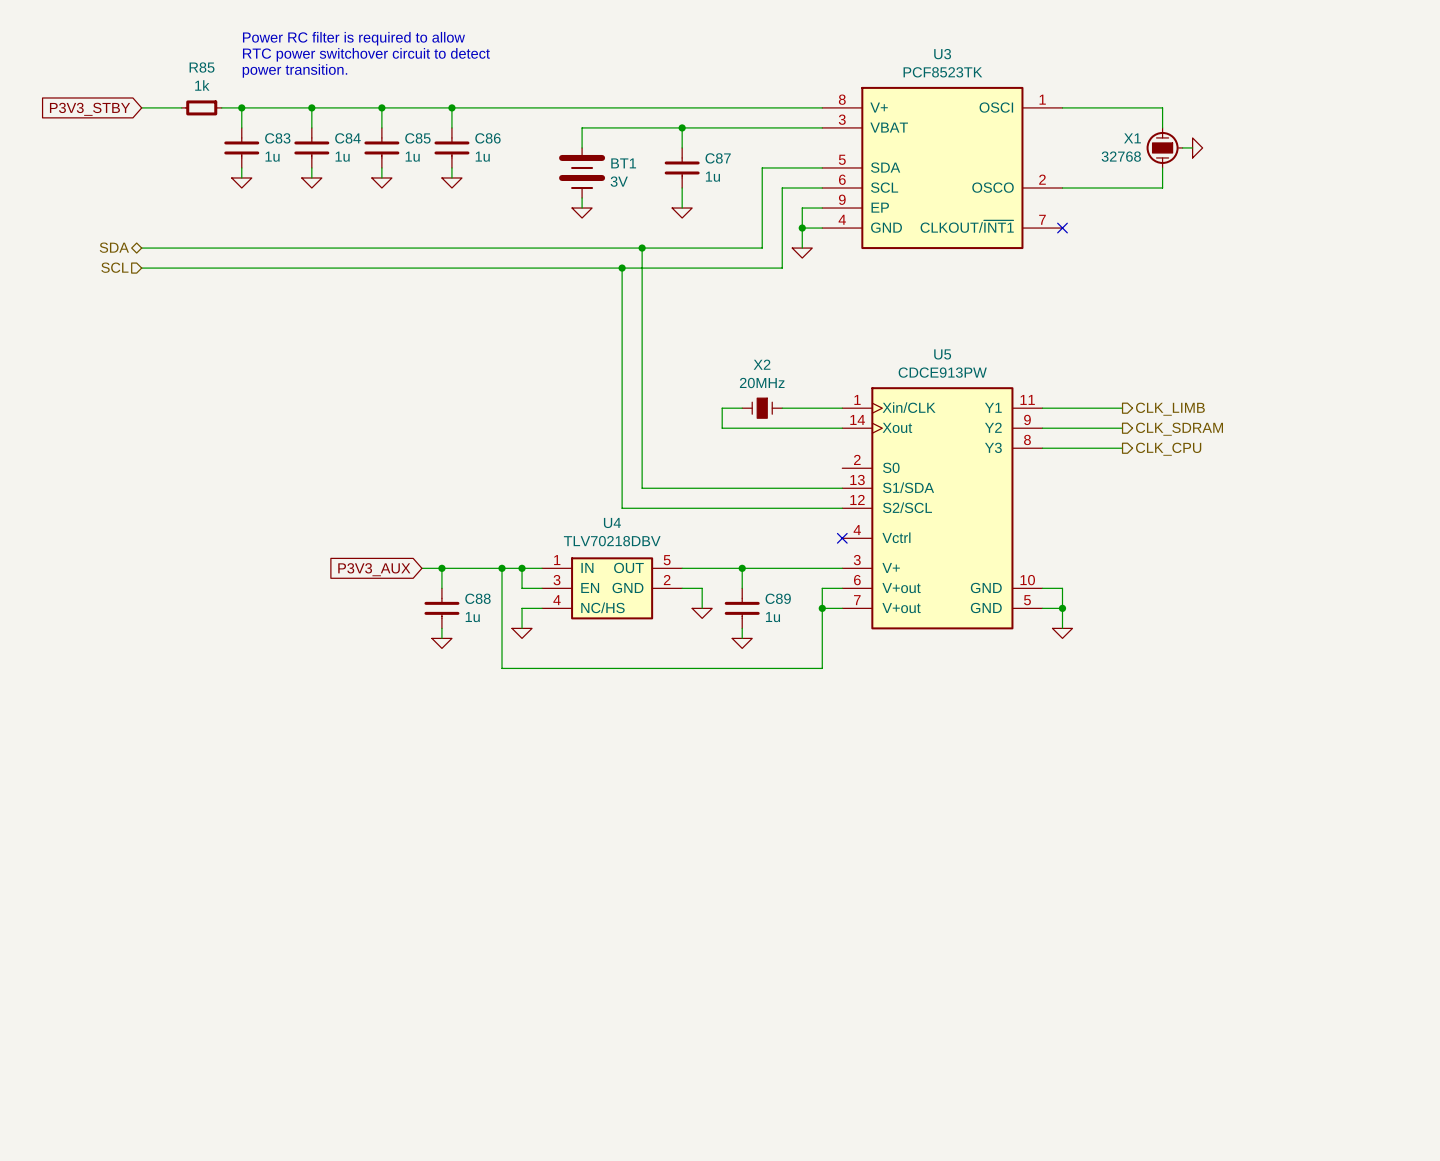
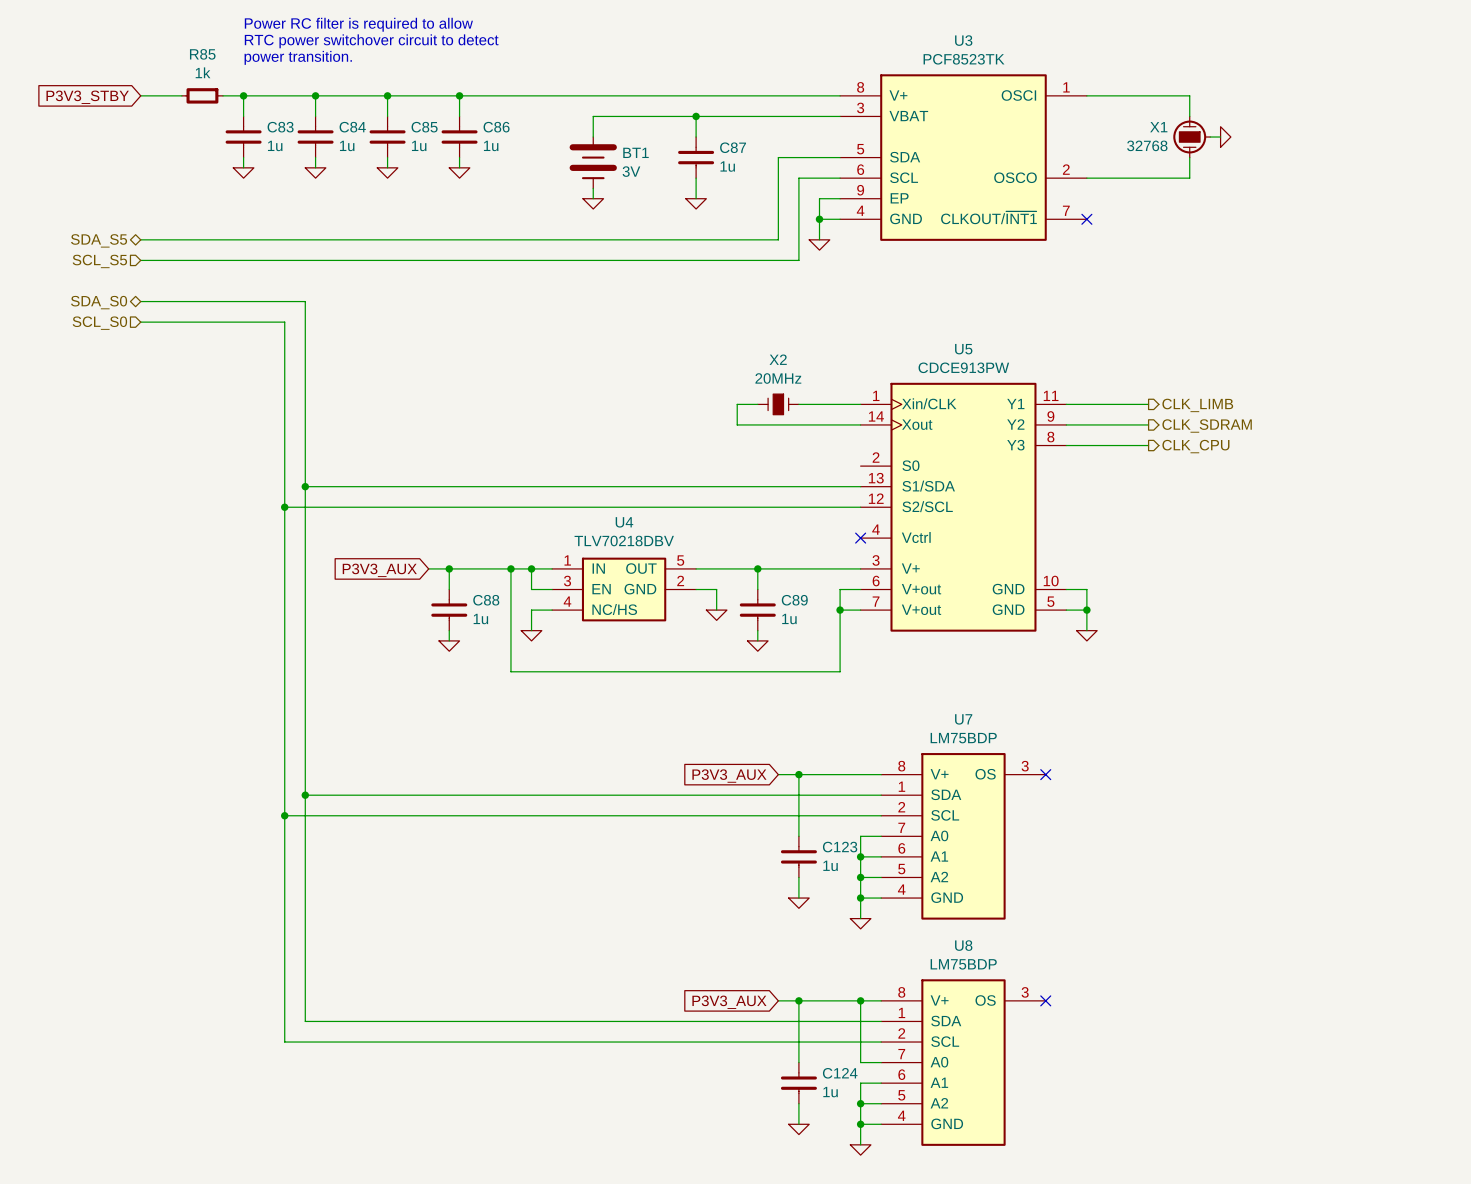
hierarchical label: SDA (114, 247) -> SDA_S5 (99, 240)
wire: (642, 248) (642, 488) -> (305, 486) (654, 486)
junction: (642, 248) -> none
hierarchical label: SCL (114, 267) -> SCL_S5 (99, 261)
wire: (622, 268) (622, 508) -> (284, 507) (634, 507)
junction: (622, 268) -> none
wire: none -> (140, 301) (305, 301) (305, 1021) (881, 1021)
hierarchical label: none -> SDA_S0 (99, 302)
wire: none -> (140, 322) (284, 322) (284, 1042) (881, 1042)
hierarchical label: none -> SCL_S0 (99, 323)
junction: none -> (305, 486)
junction: none -> (284, 507)
wire: none -> (778, 774) (881, 774)
wire: none -> (798, 774) (798, 836)
junction: none -> (798, 774)
no-connect mark: none -> (1045, 774)
global label: none -> P3V3_AUX (729, 776)
wire: none -> (305, 795) (881, 795)
junction: none -> (305, 795)
wire: none -> (284, 815) (881, 815)
junction: none -> (284, 815)
wire: none -> (881, 836) (860, 836) (860, 918)
U7: none -> LM75BDP (963, 836)
C123: none -> 1u (798, 856)
wire: none -> (860, 856) (881, 856)
junction: none -> (860, 856)
wire: none -> (798, 877) (798, 898)
wire: none -> (860, 877) (881, 877)
junction: none -> (860, 877)
wire: none -> (860, 898) (881, 898)
junction: none -> (860, 898)
power symbol: none -> (798, 903)
power symbol: none -> (860, 923)
wire: none -> (778, 1000) (881, 1000)
wire: none -> (798, 1000) (798, 1062)
junction: none -> (798, 1000)
wire: none -> (860, 1000) (860, 1062) (881, 1062)
junction: none -> (860, 1000)
no-connect mark: none -> (1045, 1000)
global label: none -> P3V3_AUX (729, 1002)
U8: none -> LM75BDP (963, 1062)
C124: none -> 1u (798, 1083)
wire: none -> (881, 1083) (860, 1083) (860, 1144)
wire: none -> (798, 1103) (798, 1124)
wire: none -> (860, 1103) (881, 1103)
junction: none -> (860, 1103)
wire: none -> (860, 1124) (881, 1124)
junction: none -> (860, 1124)
power symbol: none -> (798, 1129)
power symbol: none -> (860, 1150)

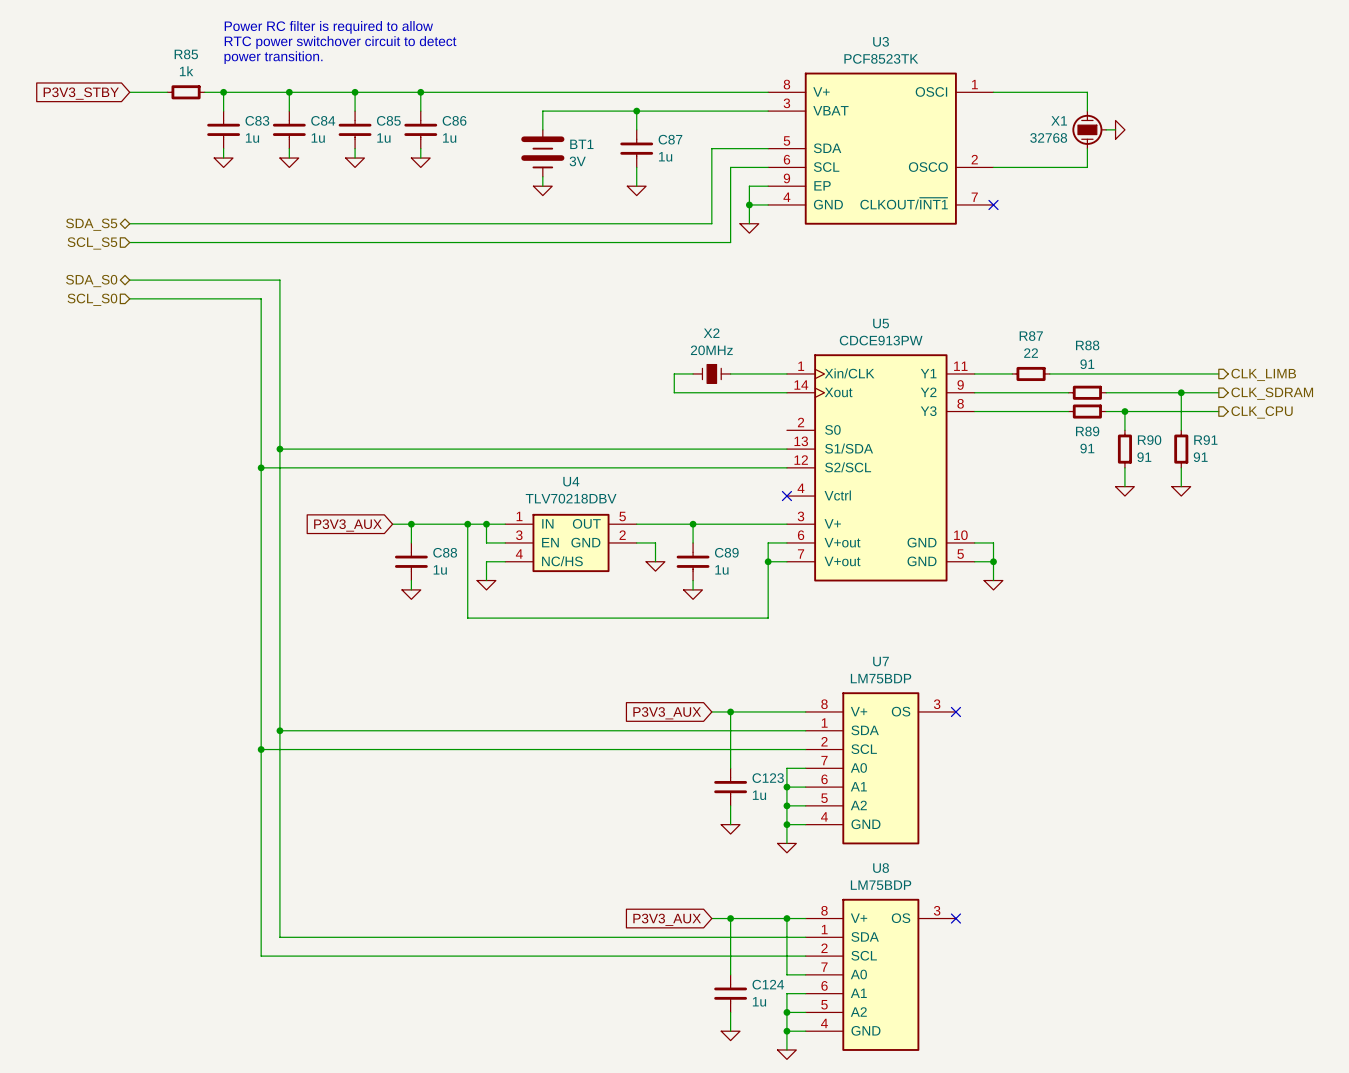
wire: (1107, 404) (1148, 404) -> (1218, 373) (1049, 373)
R87: none -> 22 (1031, 373)
hierarchical label position: CLK_LIMB (1197, 405) -> CLK_LIMB (1263, 374)
wire: none -> (1049, 392) (1068, 392)
R88: none -> 91 (1087, 392)
wire: none -> (1106, 392) (1218, 392)
wire: none -> (1181, 392) (1181, 430)
junction: none -> (1181, 392)
hierarchical label position: CLK_SDRAM (1207, 425) -> CLK_SDRAM (1272, 393)
wire: none -> (1049, 411) (1068, 411)
R89: none -> 91 (1087, 411)
wire: none -> (1106, 411) (1218, 411)
wire: none -> (1124, 411) (1124, 430)
junction: none -> (1124, 411)
hierarchical label position: CLK_CPU (1195, 446) -> CLK_CPU (1262, 412)
R90: none -> 91 (1124, 449)
R91: none -> 91 (1181, 449)
wire: none -> (1124, 467) (1124, 486)
wire: none -> (1181, 467) (1181, 486)
power symbol: none -> (1124, 491)
power symbol: none -> (1181, 491)

